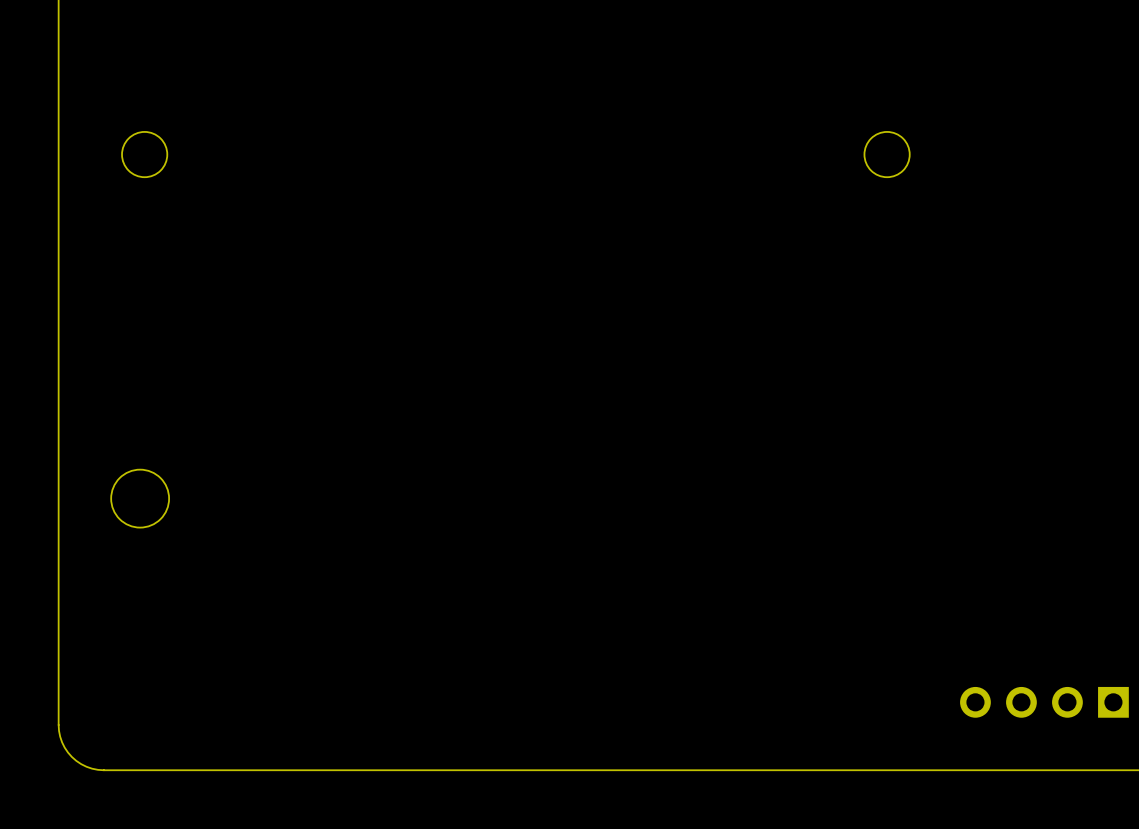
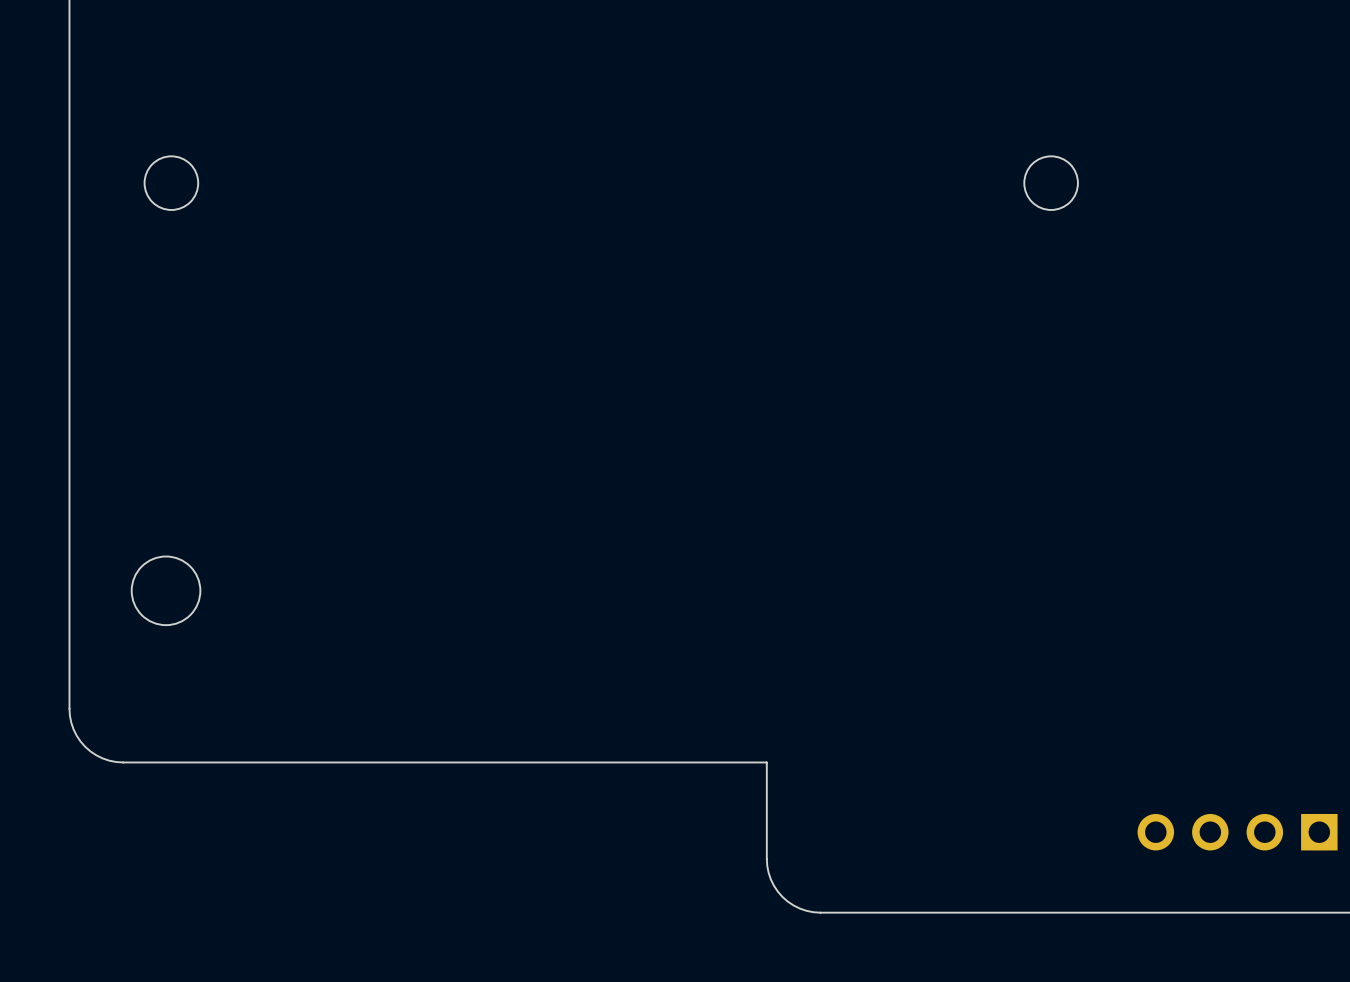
board edge: (58, 598) (59, 730) (62, 742) (67, 752) (76, 760) (92, 768) (103, 770) (692, 770) -> (69, 708) (71, 722) (80, 741) (96, 755) (116, 762) (766, 762) (766, 859) (770, 879) (777, 891) (787, 901) (799, 908) (820, 912)

